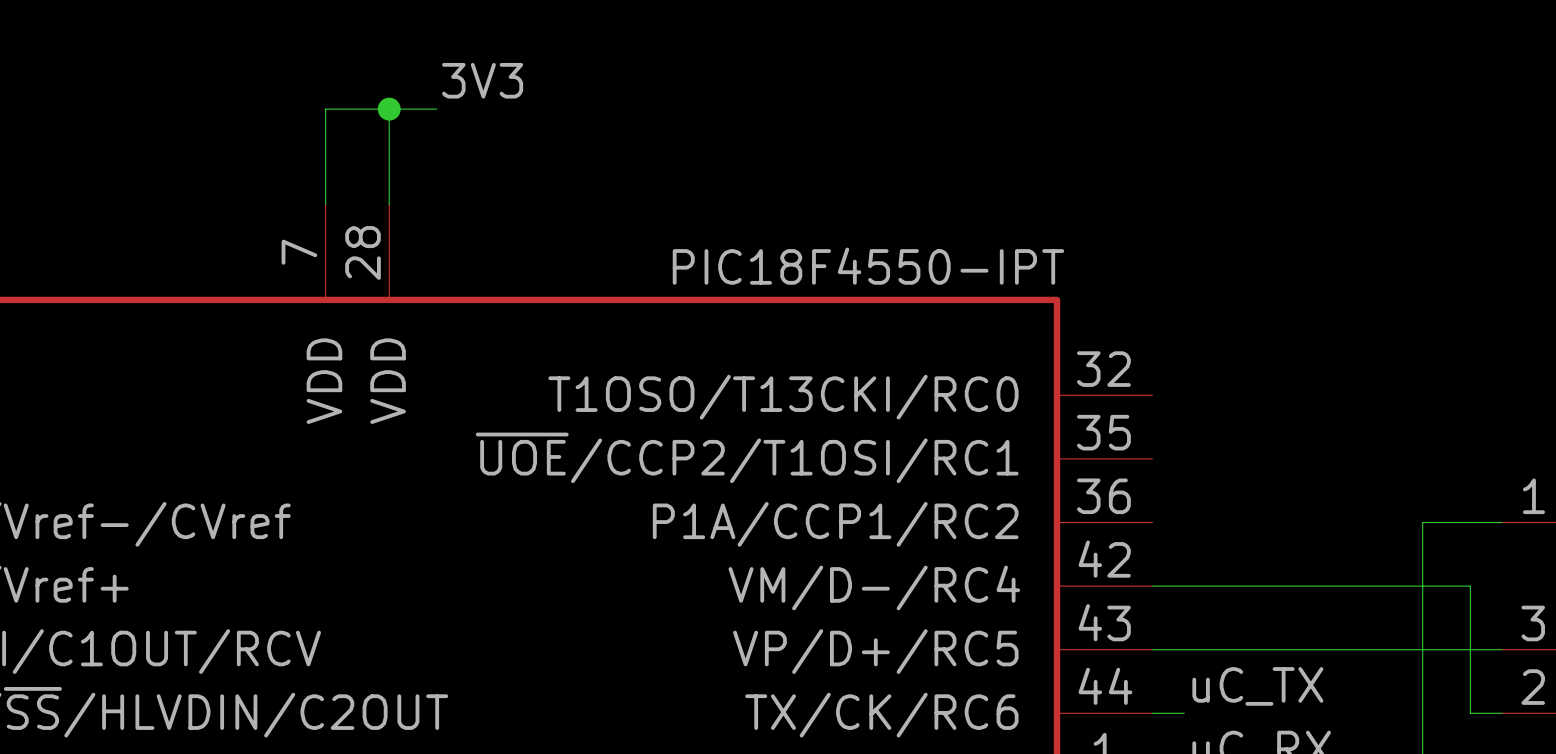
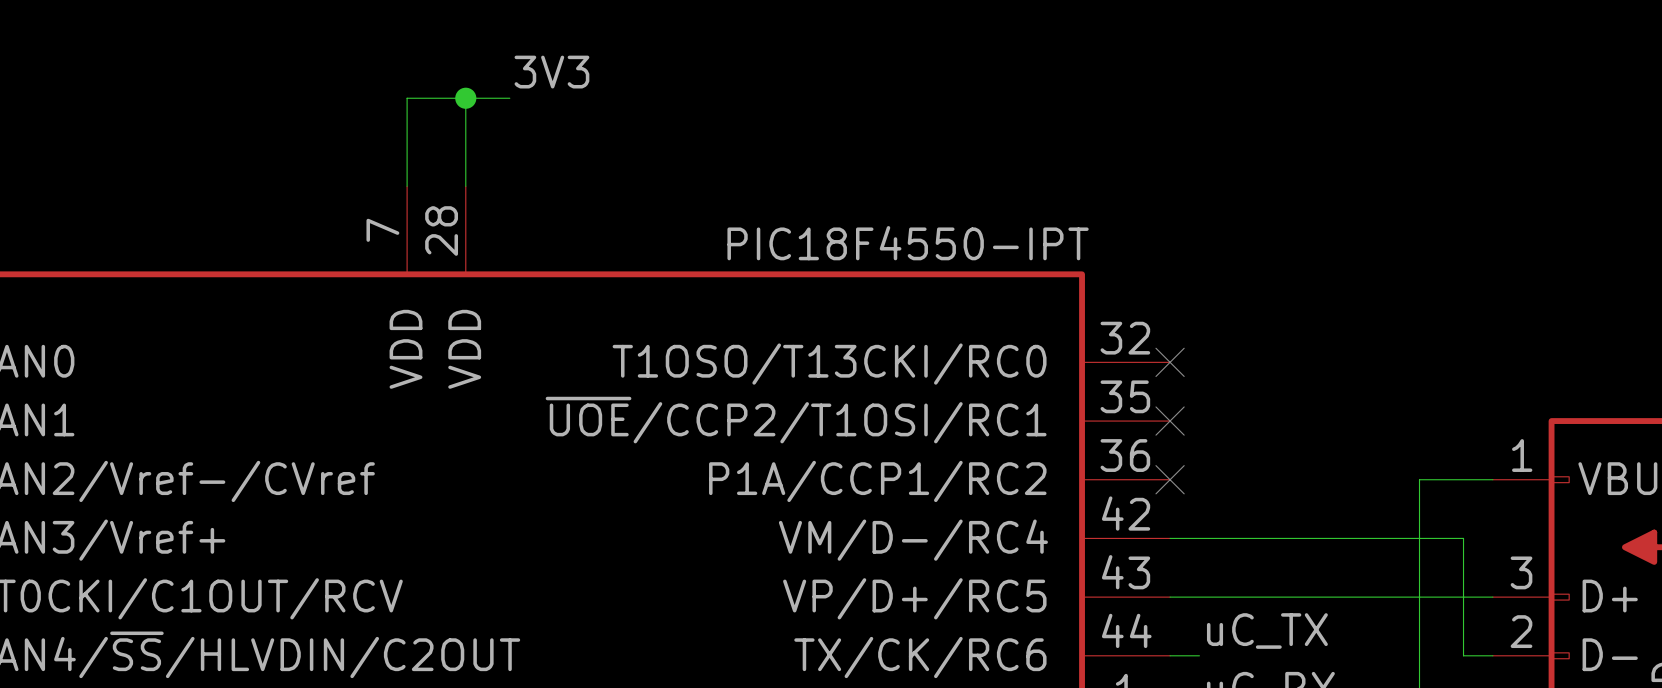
no-connect mark: none -> (1170, 362)
no-connect mark: none -> (1170, 421)
no-connect mark: none -> (1170, 479)

